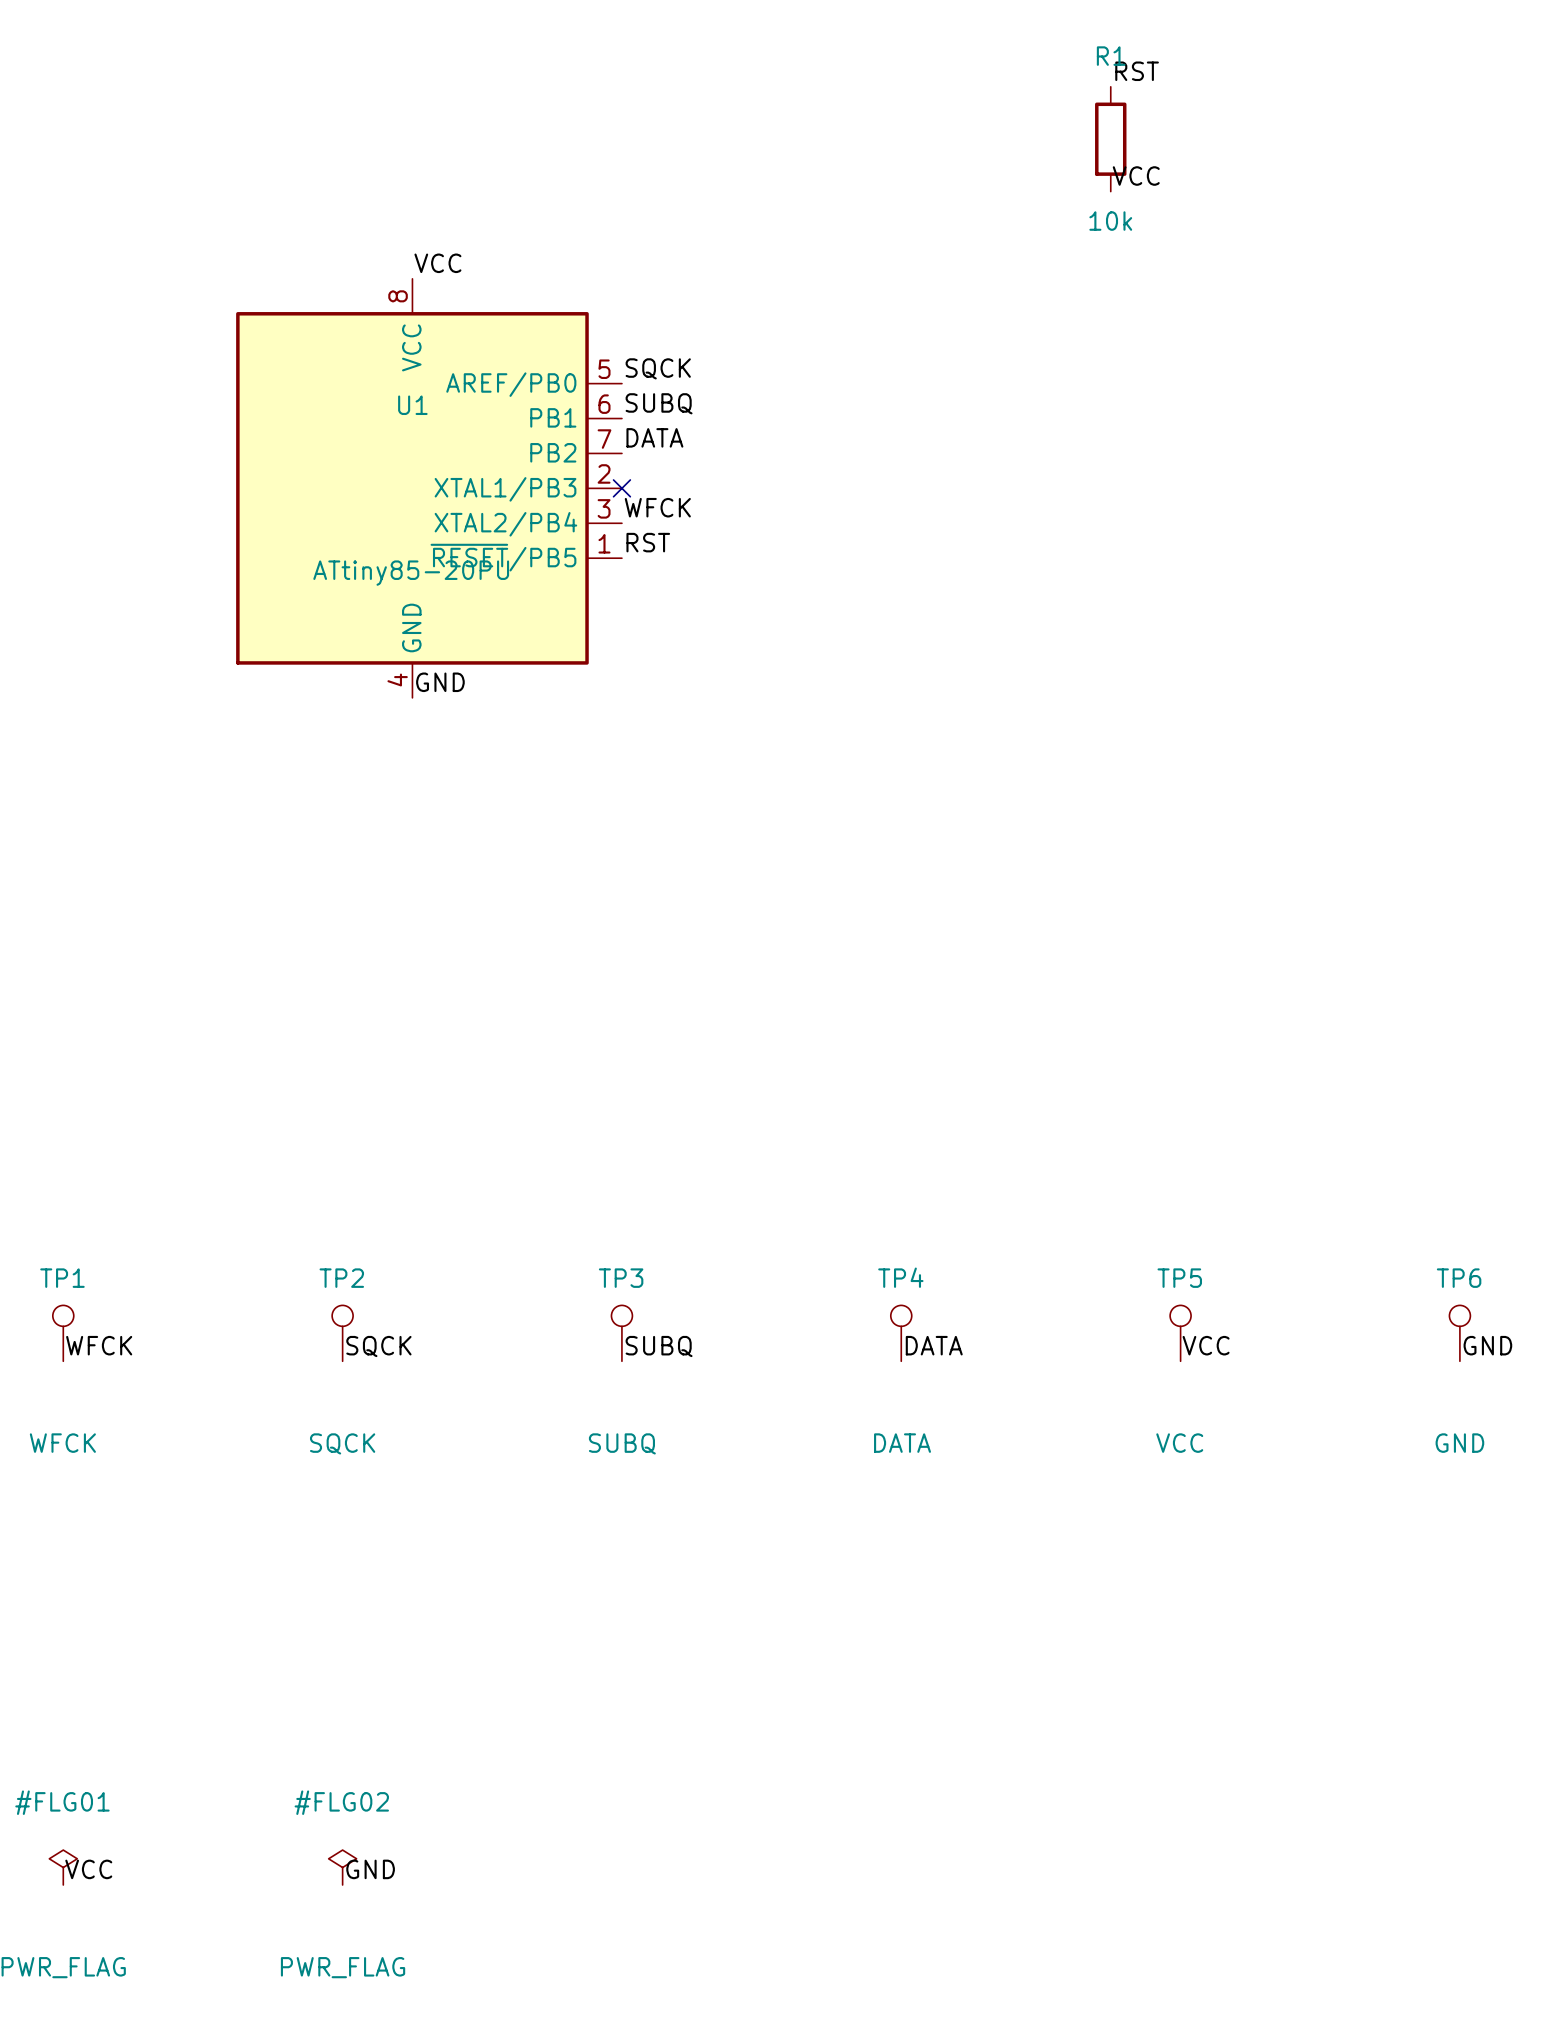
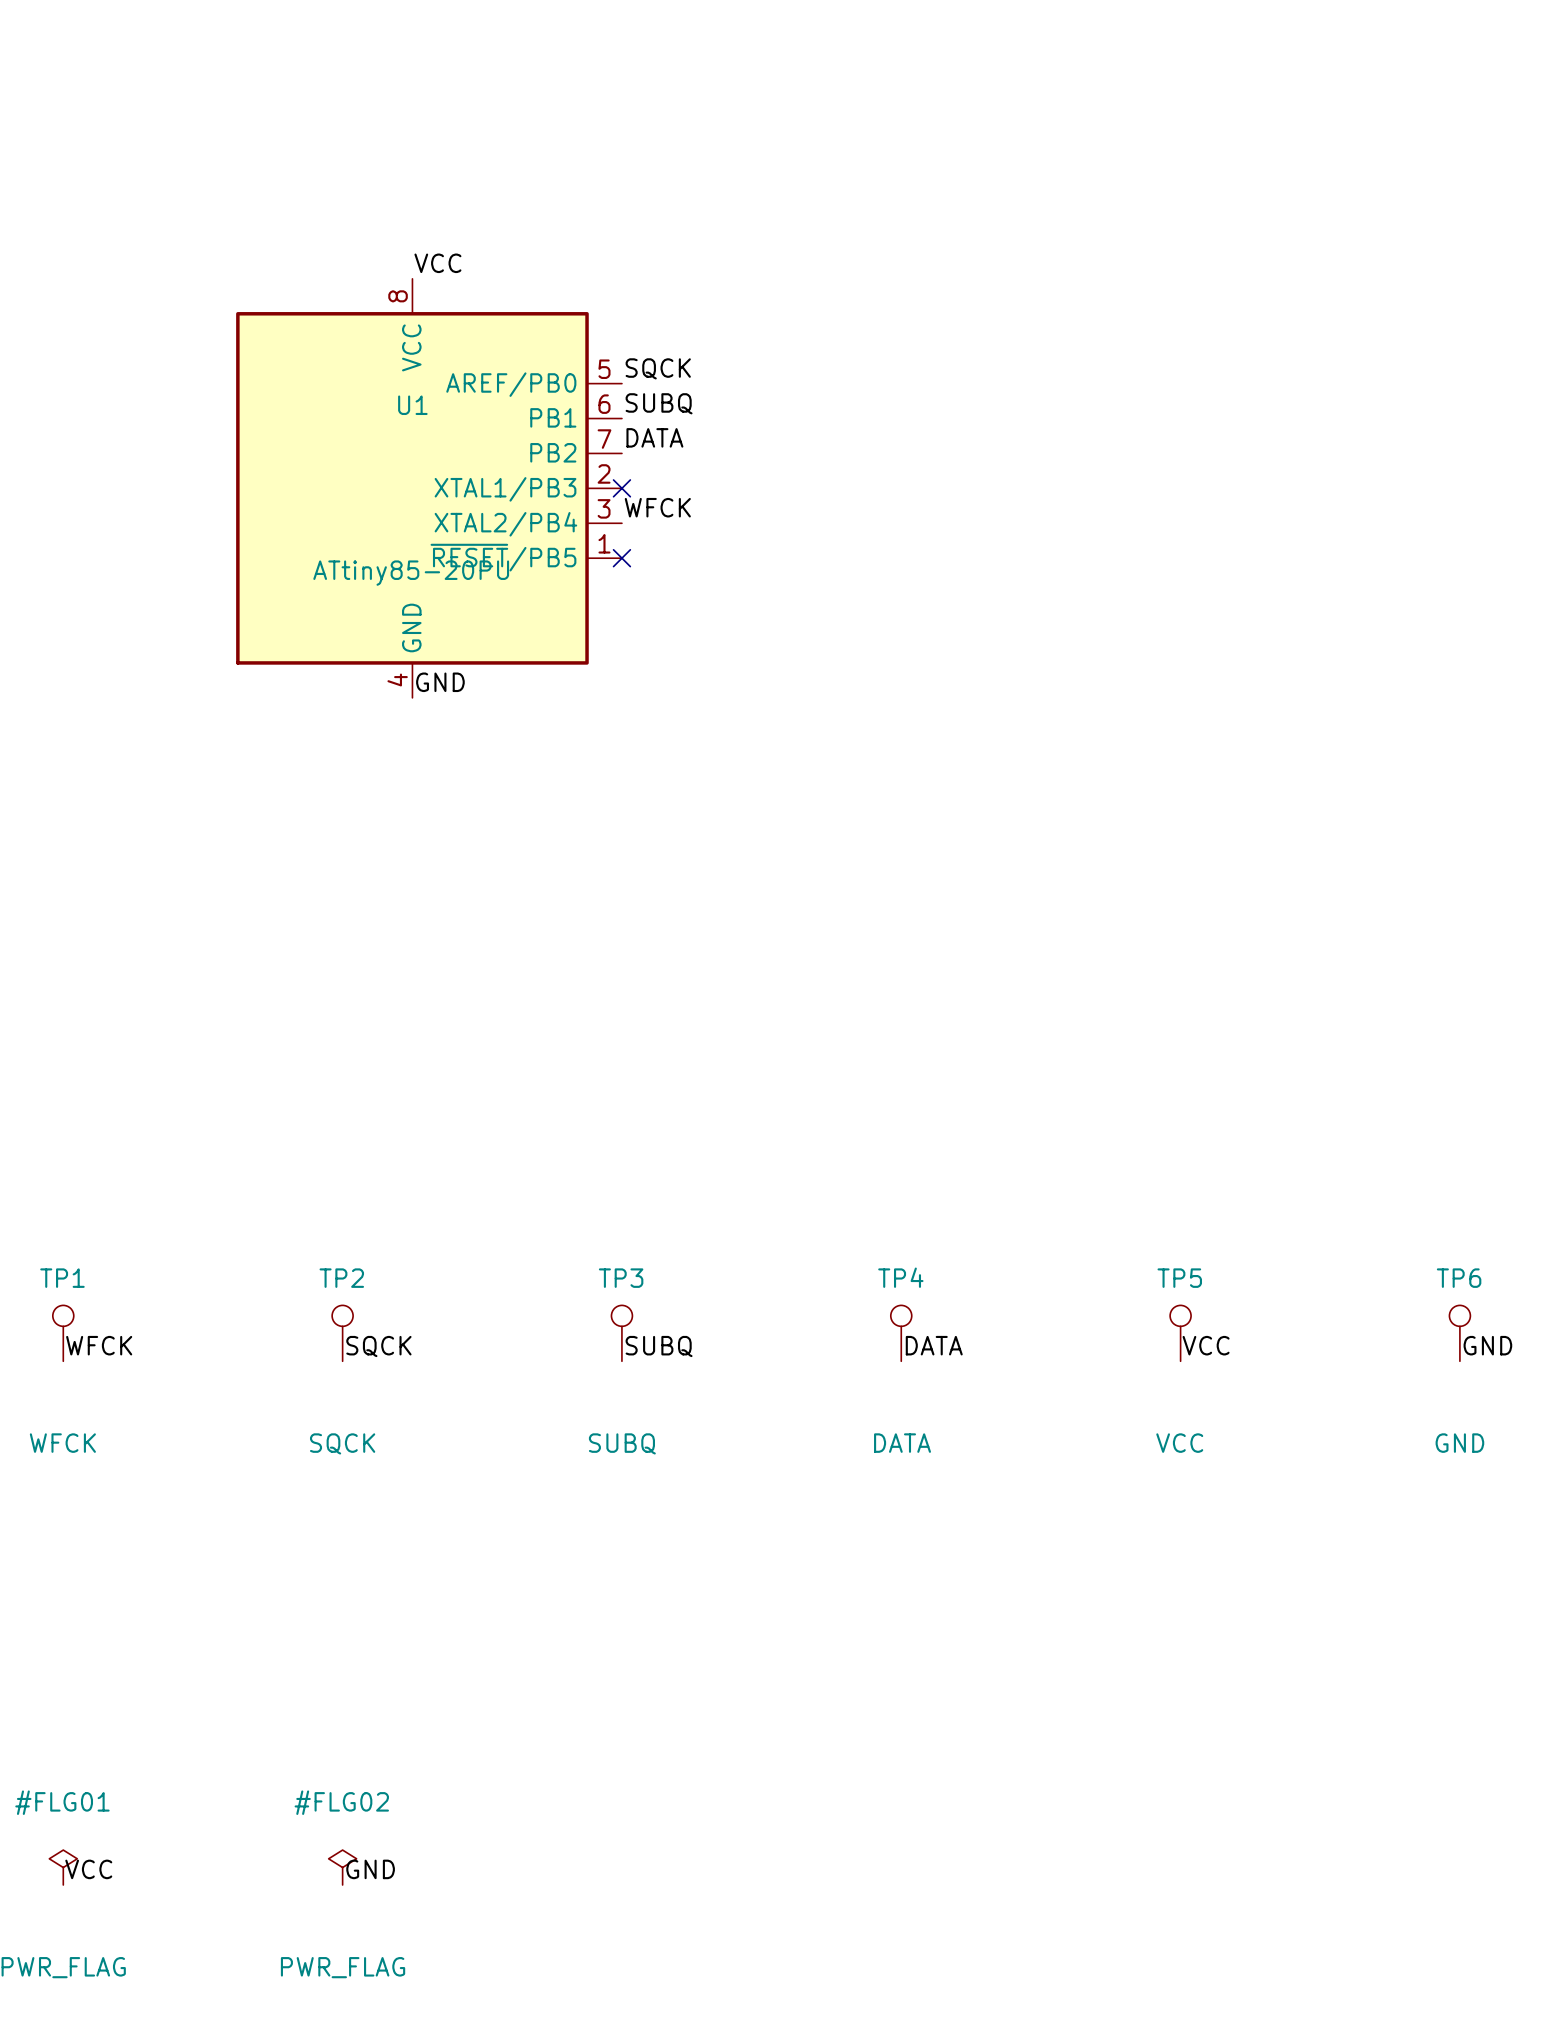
label: RST (1137, 71) -> none
R1: 10k (1110, 139) -> none
label: VCC (1136, 176) -> none
label: RST (648, 542) -> none
no-connect mark: none -> (621, 558)

